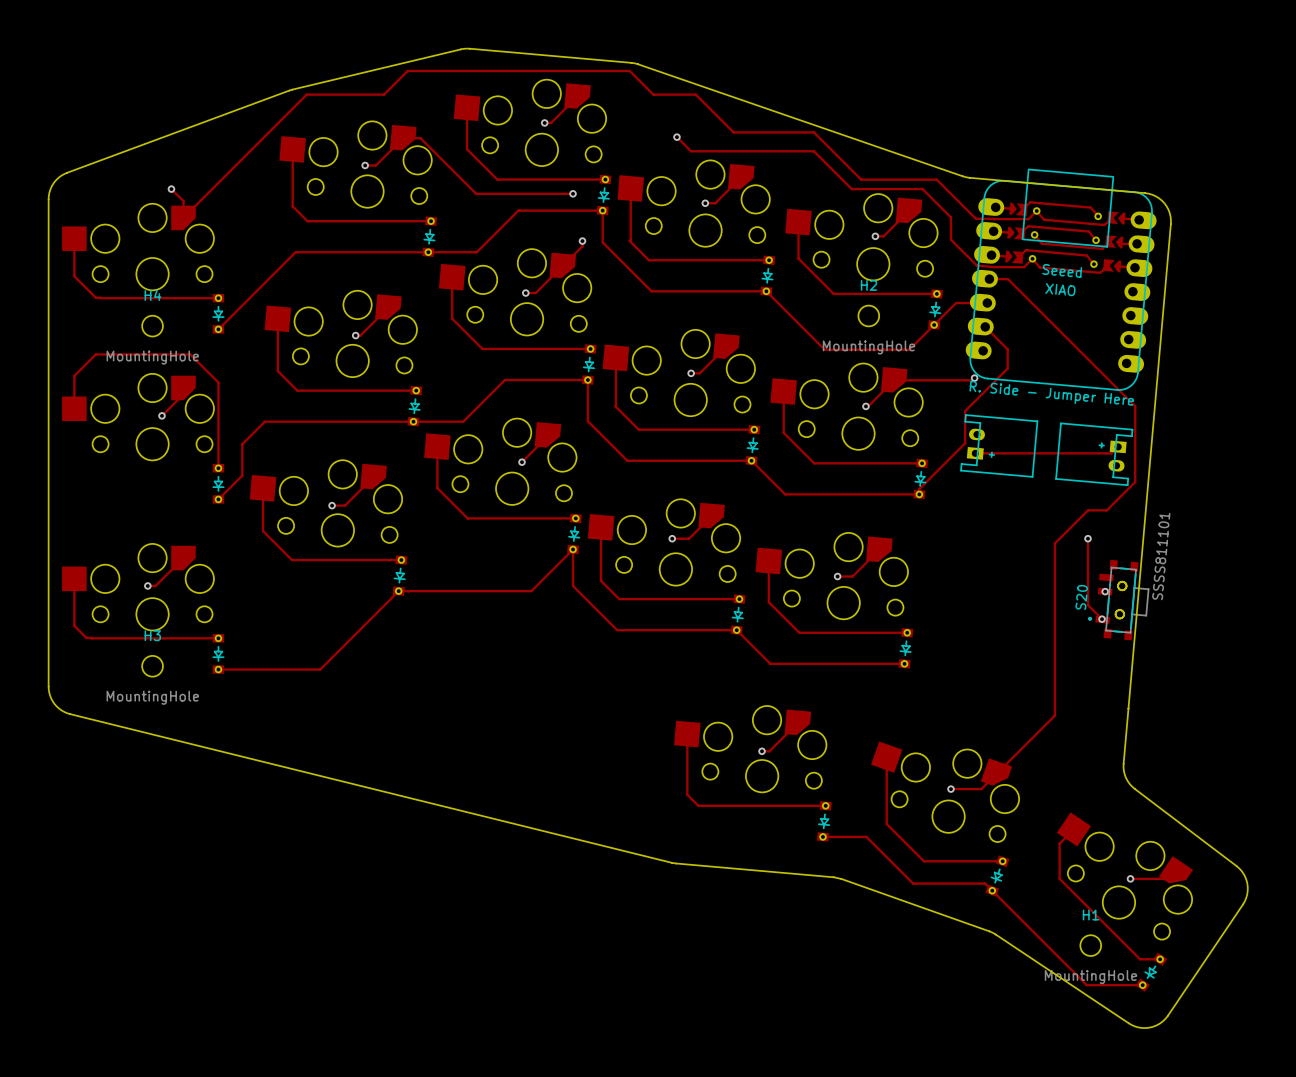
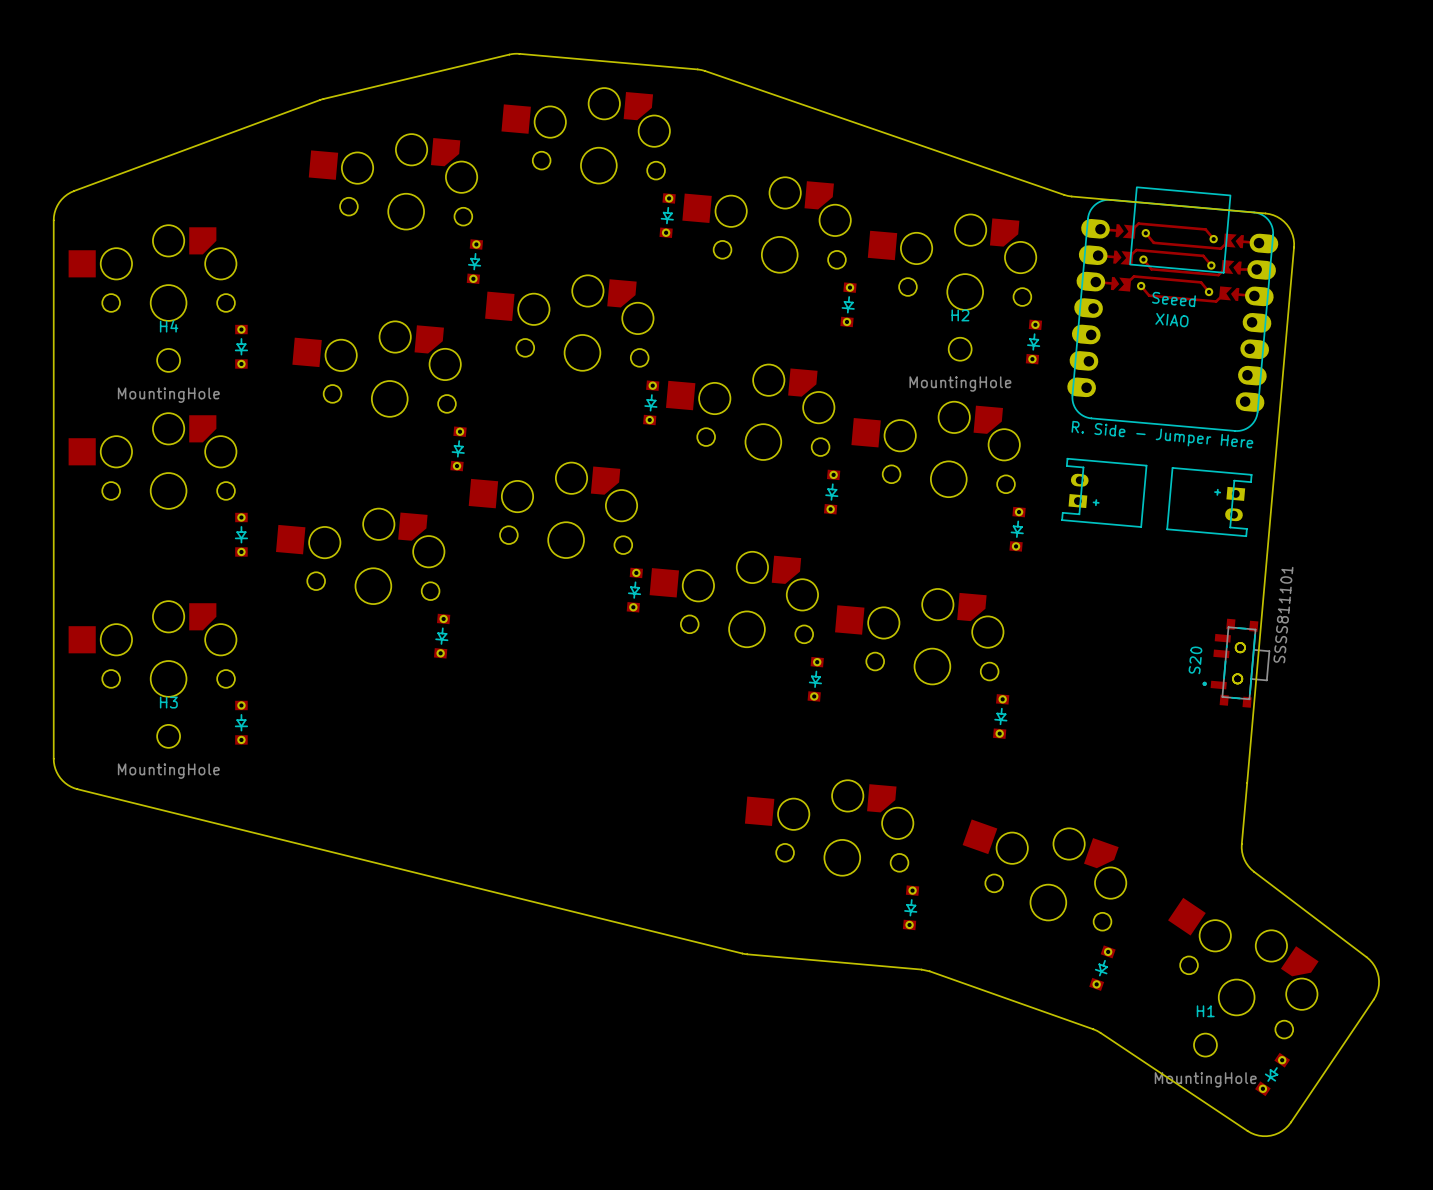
track: (577, 96) (551, 122) (544, 122) -> none
track: (467, 107) (467, 149) (497, 179) (605, 179) -> none
via: (544, 122) -> none
track: (676, 137) (691, 151) (813, 151) (851, 189) (922, 189) (950, 217) (950, 239) (976, 265) (1024, 267) (1032, 258) -> none
via: (676, 137) -> none
track: (292, 149) (292, 206) (307, 221) (431, 221) -> none
track: (365, 165) (375, 165) (403, 138) (420, 138) (476, 193) (573, 193) -> none
via: (365, 165) -> none
track: (741, 177) (715, 203) (705, 203) -> none
track: (630, 188) (629, 241) (648, 260) (769, 260) -> none
track: (171, 189) (183, 201) (183, 217) (306, 94) (384, 94) (407, 70) (629, 70) (653, 94) (695, 94) (733, 132) (813, 132) (861, 179) (936, 179) (975, 218) (1028, 219) (1036, 210) -> none
via: (171, 189) -> none
via: (573, 193) -> none
via: (705, 203) -> none
track: (909, 210) (883, 236) (875, 236) -> none
track: (798, 222) (798, 258) (833, 293) (936, 293) -> none
via: (875, 236) -> none
track: (74, 238) (74, 276) (95, 297) (218, 298) -> none
track: (582, 241) (582, 246) (535, 293) (525, 293) -> none
via: (582, 241) -> none
track: (452, 277) (452, 318) (482, 348) (590, 348) -> none
track: (989, 279) (1007, 279) (1135, 406) (1135, 482) (1106, 510) (1087, 510) (1054, 543) (1054, 715) (981, 789) (950, 789) -> none
via: (525, 293) -> none
track: (987, 303) (956, 303) (909, 349) (824, 349) (766, 291) (651, 291) (602, 242) (602, 210) (518, 210) (476, 252) (295, 252) (218, 329) -> none
track: (388, 307) (360, 335) (355, 335) -> none
track: (277, 318) (277, 371) (297, 390) (416, 390) -> none
track: (985, 326) (1007, 349) (1007, 368) (965, 411) (965, 443) (919, 489) (919, 494) (785, 494) (751, 460) (627, 460) (587, 421) (587, 380) (504, 380) (463, 421) (264, 421) (242, 444) (242, 475) (218, 499) -> none
via: (355, 335) -> none
track: (726, 346) (699, 373) (691, 373) -> none
track: (615, 357) (615, 406) (638, 429) (754, 429) -> none
via: (691, 373) -> none
track: (974, 378) (972, 380) (894, 380) (865, 406) -> none
via: (974, 378) -> none
track: (182, 389) (183, 388) (183, 394) (162, 415) -> none
track: (783, 391) (783, 432) (814, 463) (922, 463) -> none
via: (865, 406) -> none
track: (74, 408) (74, 375) (95, 354) (190, 354) (218, 382) (218, 468) -> none
via: (162, 415) -> none
track: (547, 435) (521, 462) -> none
track: (437, 446) (437, 488) (467, 518) (575, 518) -> none
track: (1118, 446) (1111, 453) (975, 453) -> none
via: (521, 462) -> none
track: (373, 477) (345, 505) (332, 505) -> none
track: (263, 488) (263, 531) (292, 560) (401, 560) -> none
via: (332, 505) -> none
track: (711, 516) (689, 538) (672, 538) -> none
track: (601, 527) (601, 580) (619, 599) (739, 599) -> none
via: (672, 538) -> none
track: (1087, 538) (1087, 605) (1102, 619) -> none
via: (1087, 538) -> none
track: (879, 549) (852, 576) (837, 576) -> none
track: (182, 556) (183, 558) (155, 585) (147, 585) -> none
track: (768, 560) (768, 602) (799, 632) (907, 632) -> none
via: (837, 576) -> none
track: (74, 578) (74, 625) (86, 637) (218, 638) -> none
via: (147, 585) -> none
via: (1105, 591) -> none
via: (1102, 619) -> none
track: (904, 663) (770, 663) (736, 630) (617, 630) (573, 586) (573, 549) (531, 591) (398, 591) (320, 669) (218, 669) -> none
track: (797, 722) (769, 751) (762, 751) -> none
track: (687, 734) (687, 794) (698, 805) (825, 805) -> none
via: (762, 751) -> none
track: (886, 757) (886, 824) (923, 861) (1002, 861) -> none
via: (950, 789) -> none
track: (1073, 829) (1059, 843) (1059, 878) (1140, 959) (1160, 959) -> none
track: (822, 836) (866, 836) (913, 883) (985, 883) (1086, 985) (1142, 985) -> none
track: (1176, 873) (1170, 878) (1130, 878) -> none
via: (1130, 878) -> none

